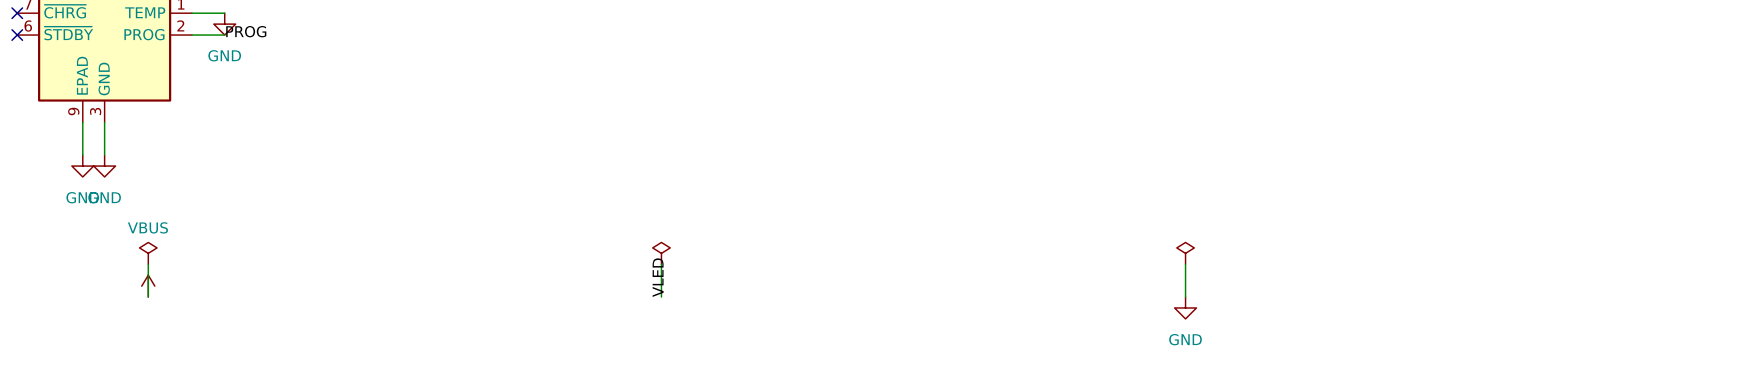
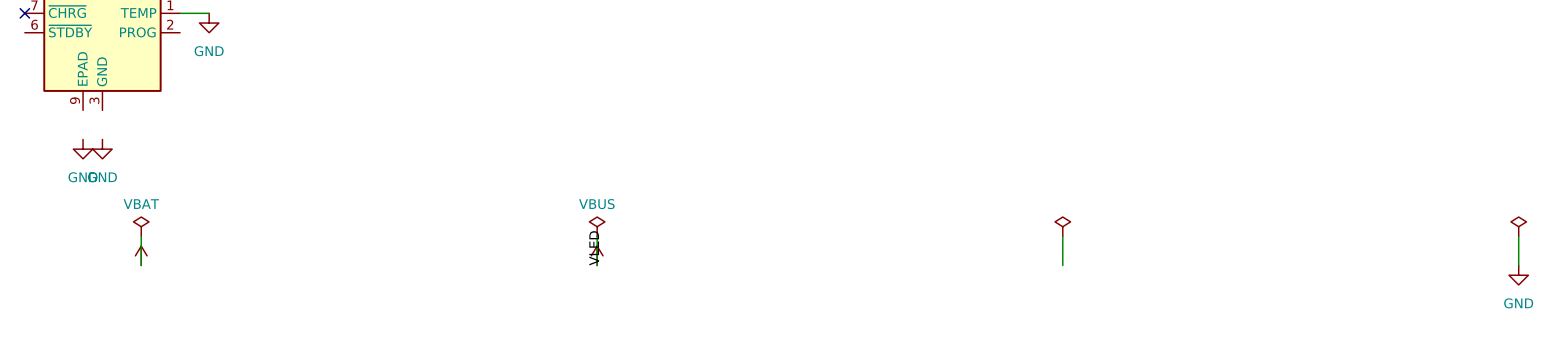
label: PROG (246, 31) -> none
no-connect mark: (17, 35) -> none
wire: (191, 35) (224, 35) -> none
wire: (82, 122) (82, 155) -> none
wire: (104, 122) (104, 155) -> none
power symbol: none -> (1518, 226)
wire: none -> (1518, 236) (1518, 265)
power symbol: VBUS (148, 286) -> VBAT (141, 255)
power symbol: none -> VBUS (597, 255)
power symbol: GND (1185, 307) -> none
power symbol: none -> GND (1518, 275)

